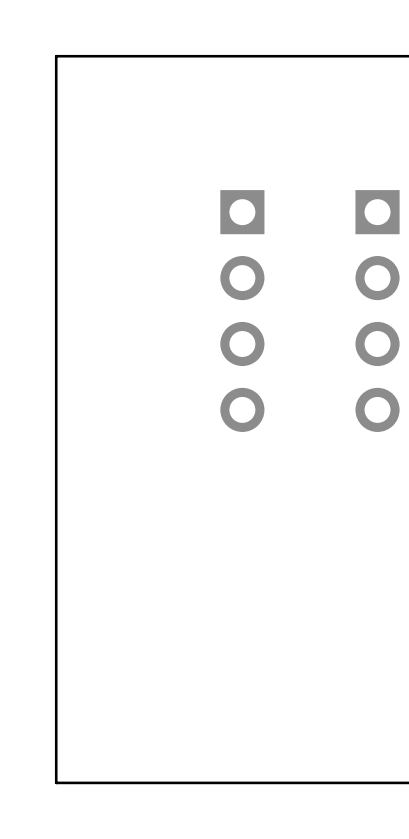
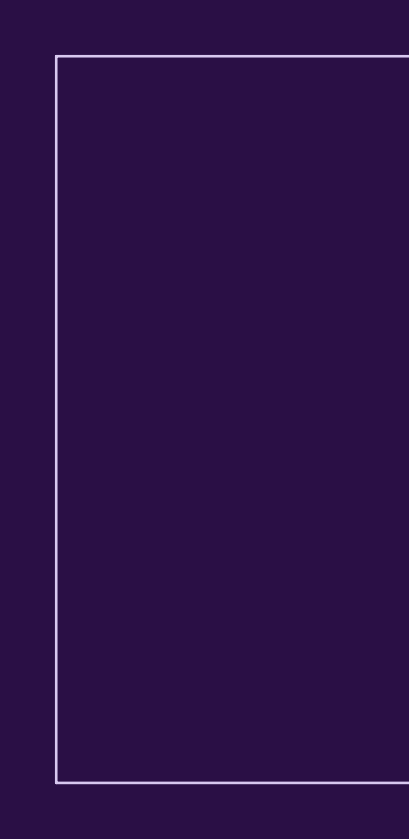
part: (242, 311) -> none
part: (377, 311) -> none

